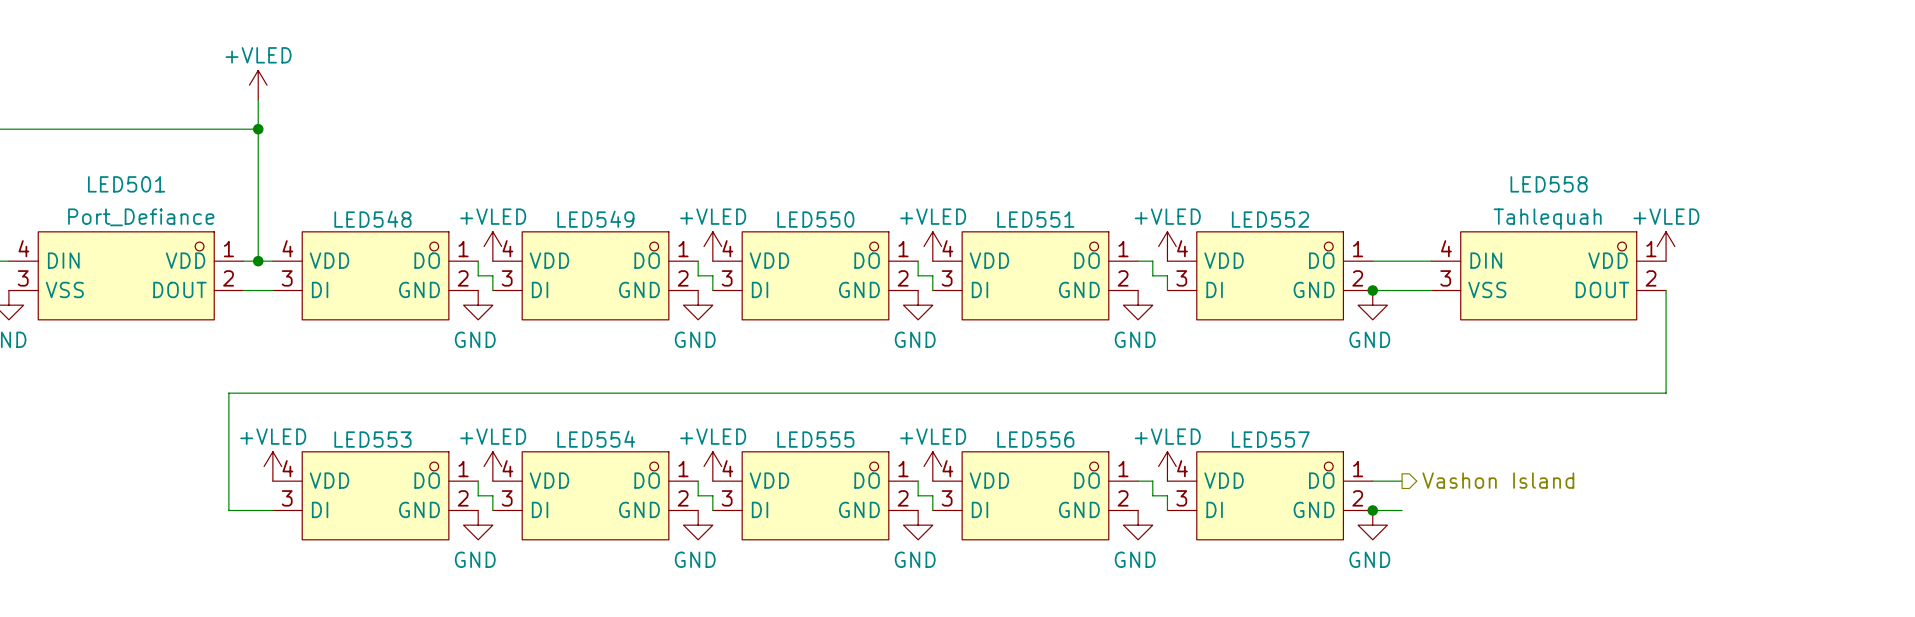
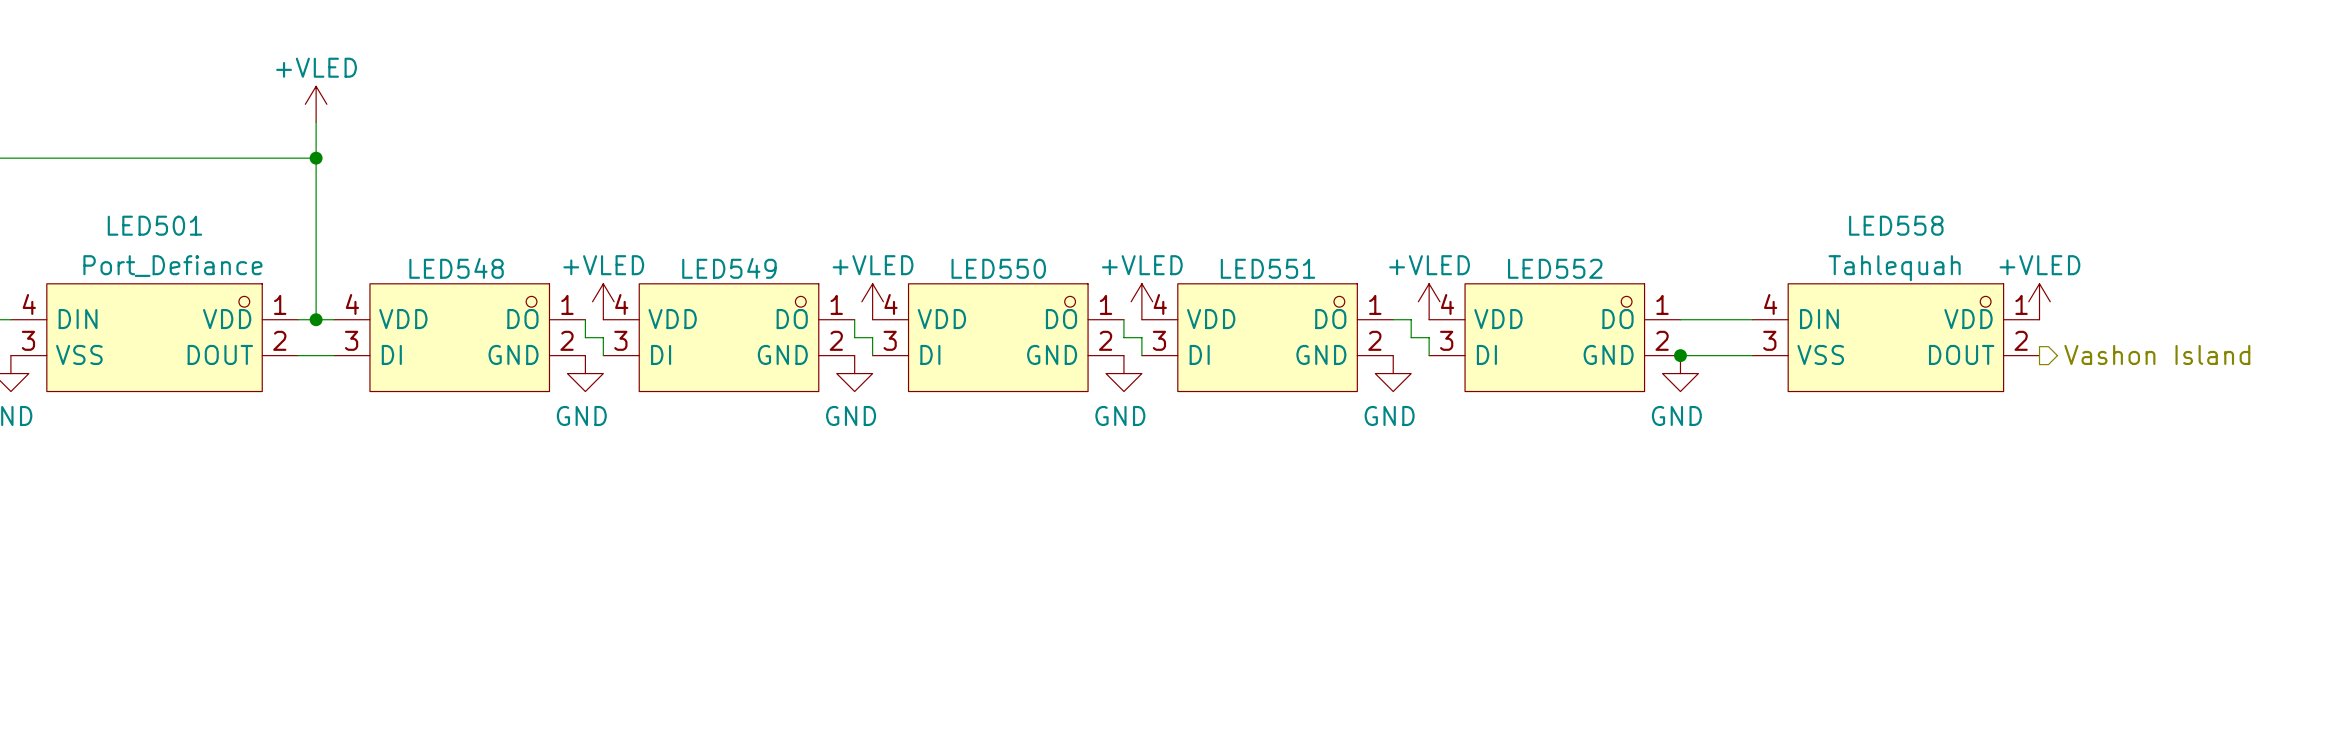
hierarchical label: none -> Vashon Island (2157, 354)
wire: (1666, 290) (1666, 393) (228, 393) (228, 510) (272, 510) -> none
power symbol: +VLED (272, 466) -> none
power symbol: +VLED (492, 466) -> none
power symbol: +VLED (712, 466) -> none
power symbol: +VLED (932, 466) -> none
power symbol: +VLED (1167, 466) -> none
hierarchical label: Vashon Island (1498, 480) -> none
wire: (478, 481) (478, 495) (492, 495) (492, 510) -> none
wire: (698, 481) (698, 495) (712, 495) (712, 510) -> none
wire: (918, 481) (918, 495) (932, 495) (932, 510) -> none
wire: (1138, 481) (1152, 481) (1152, 495) (1167, 495) (1167, 510) -> none
wire: (1372, 481) (1402, 481) -> none
LED553: (375, 495) -> none
LED554: (595, 495) -> none
LED555: (815, 495) -> none
LED556: (1035, 495) -> none
LED557: (1270, 495) -> none
wire: (1372, 510) (1402, 510) -> none
junction: (1372, 510) -> none
power symbol: GND (478, 525) -> none
power symbol: GND (698, 525) -> none
power symbol: GND (918, 525) -> none
power symbol: GND (1138, 525) -> none
power symbol: GND (1372, 525) -> none

